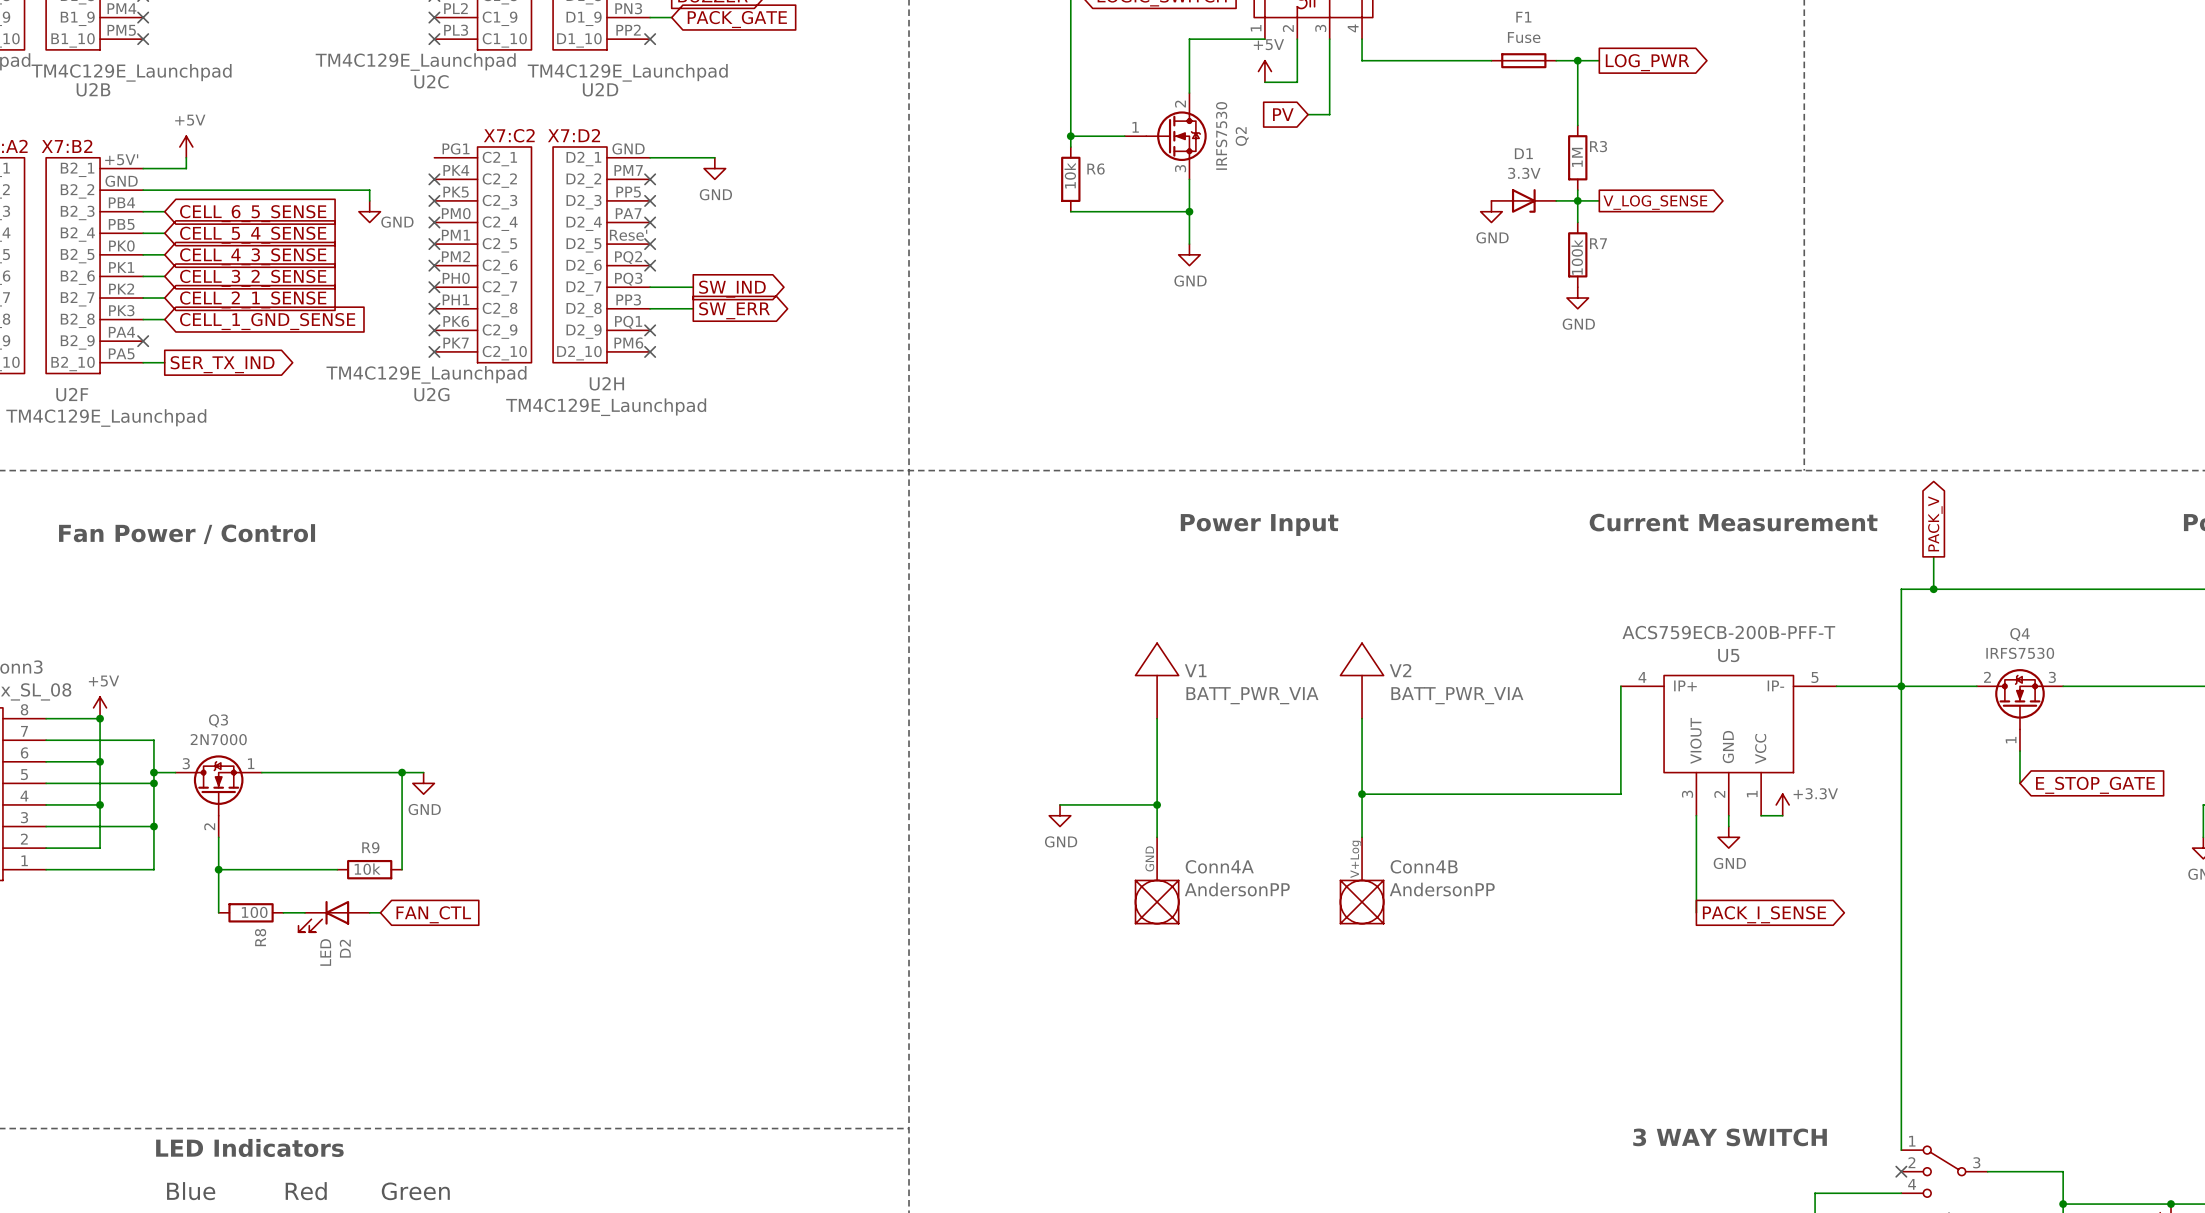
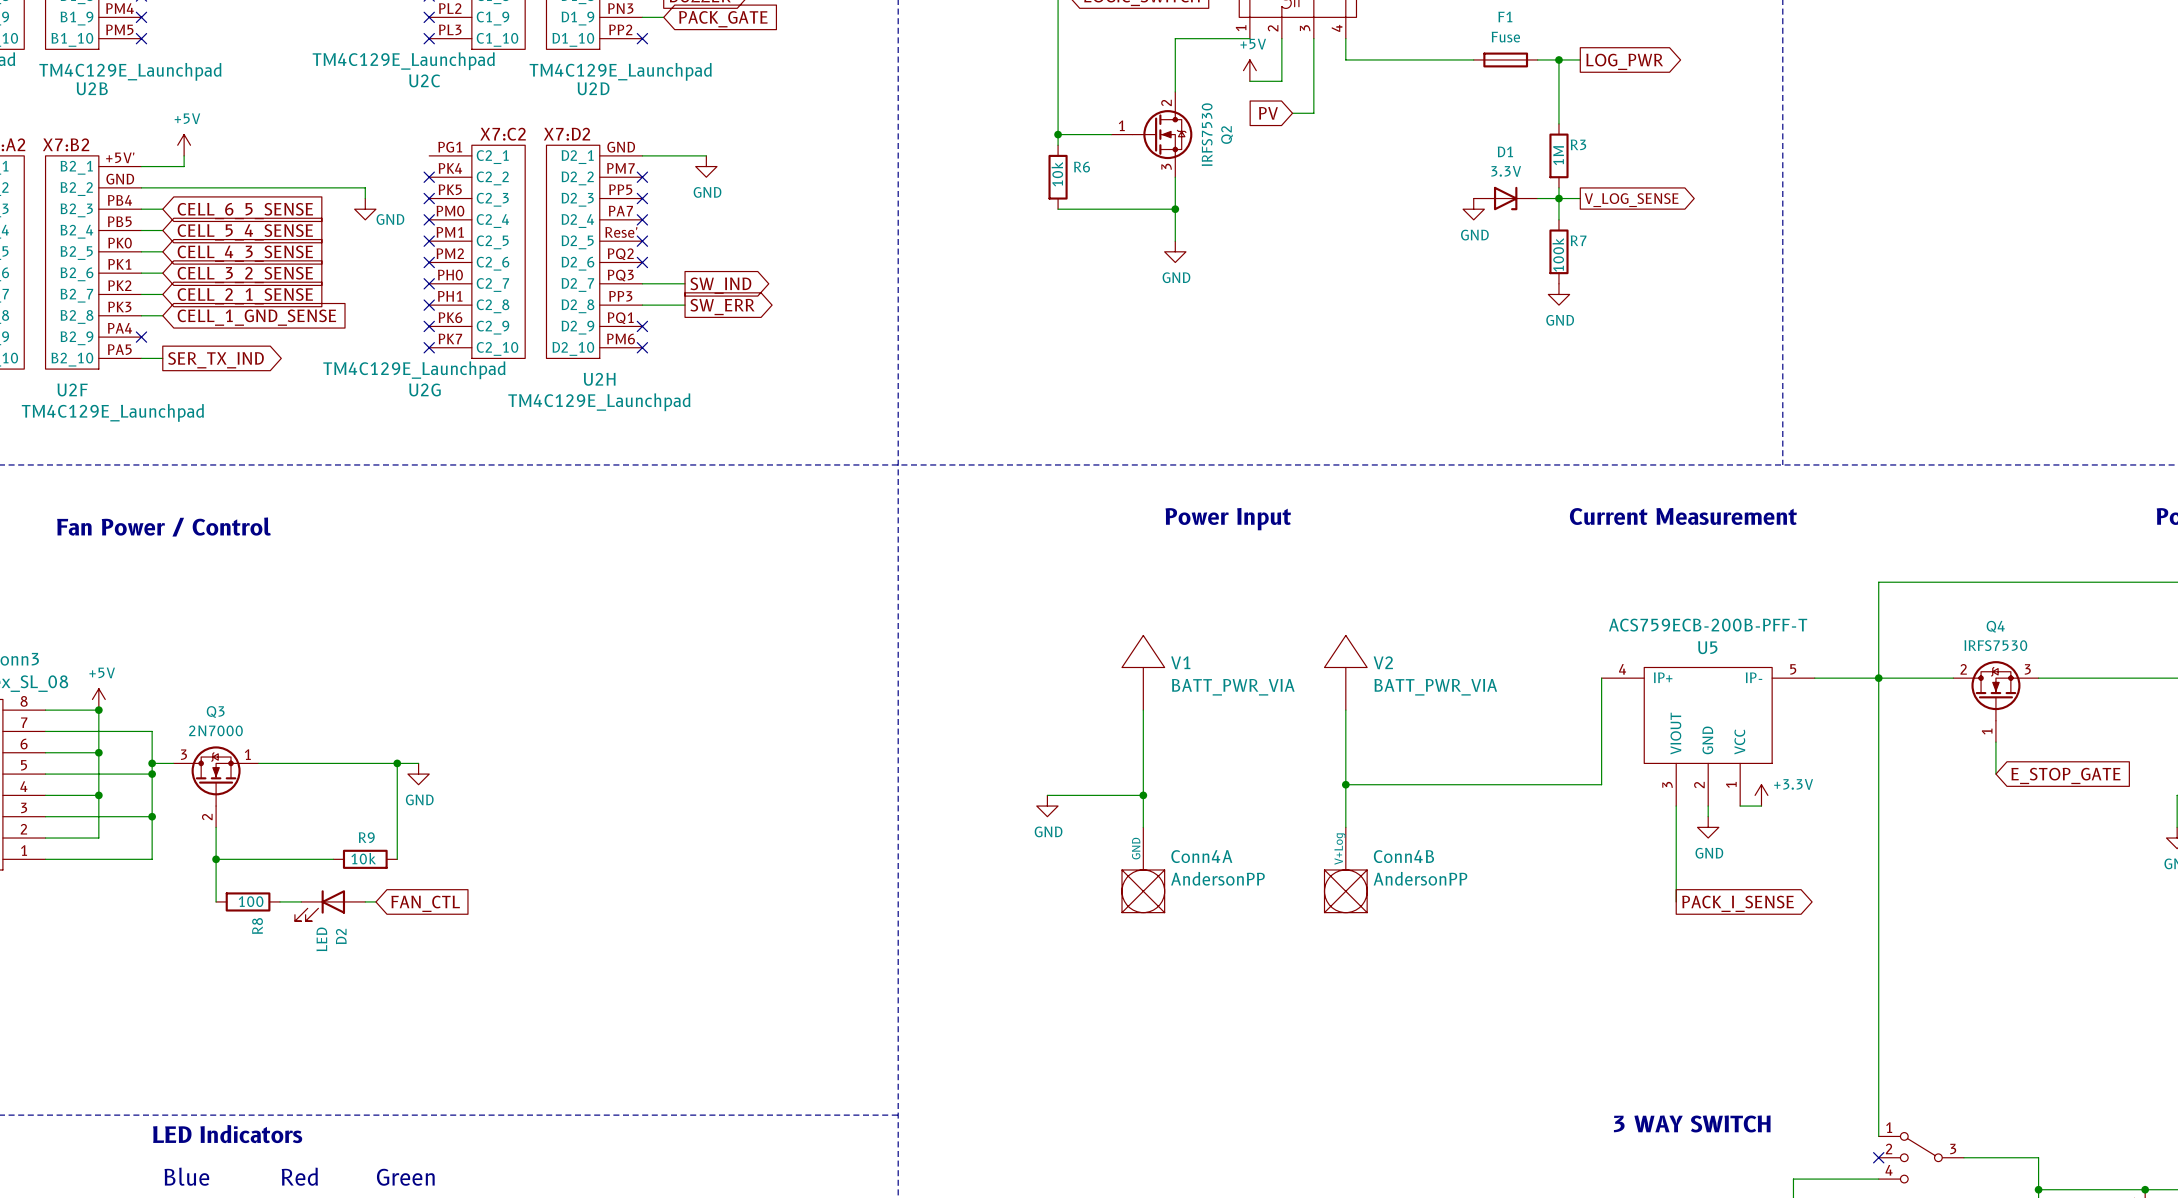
global label: PACK_V (1935, 523) -> none
wire: (1933, 556) (1933, 589) -> none
junction: (1933, 589) -> none

